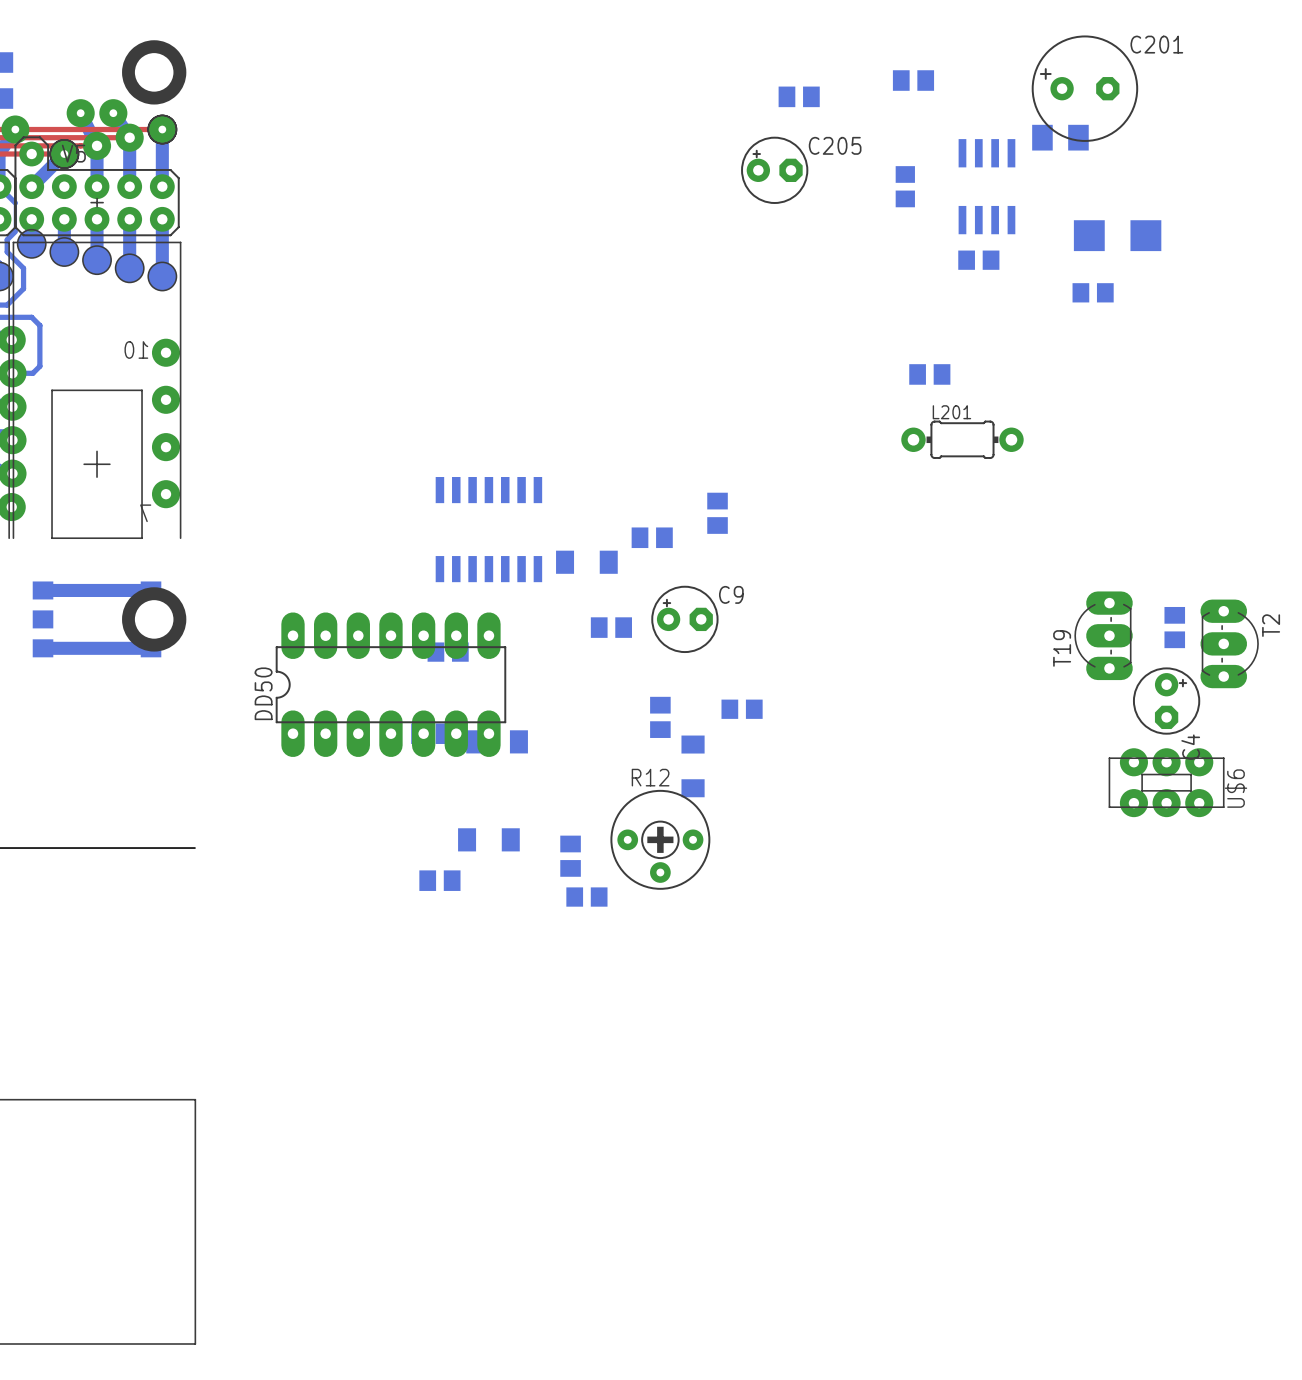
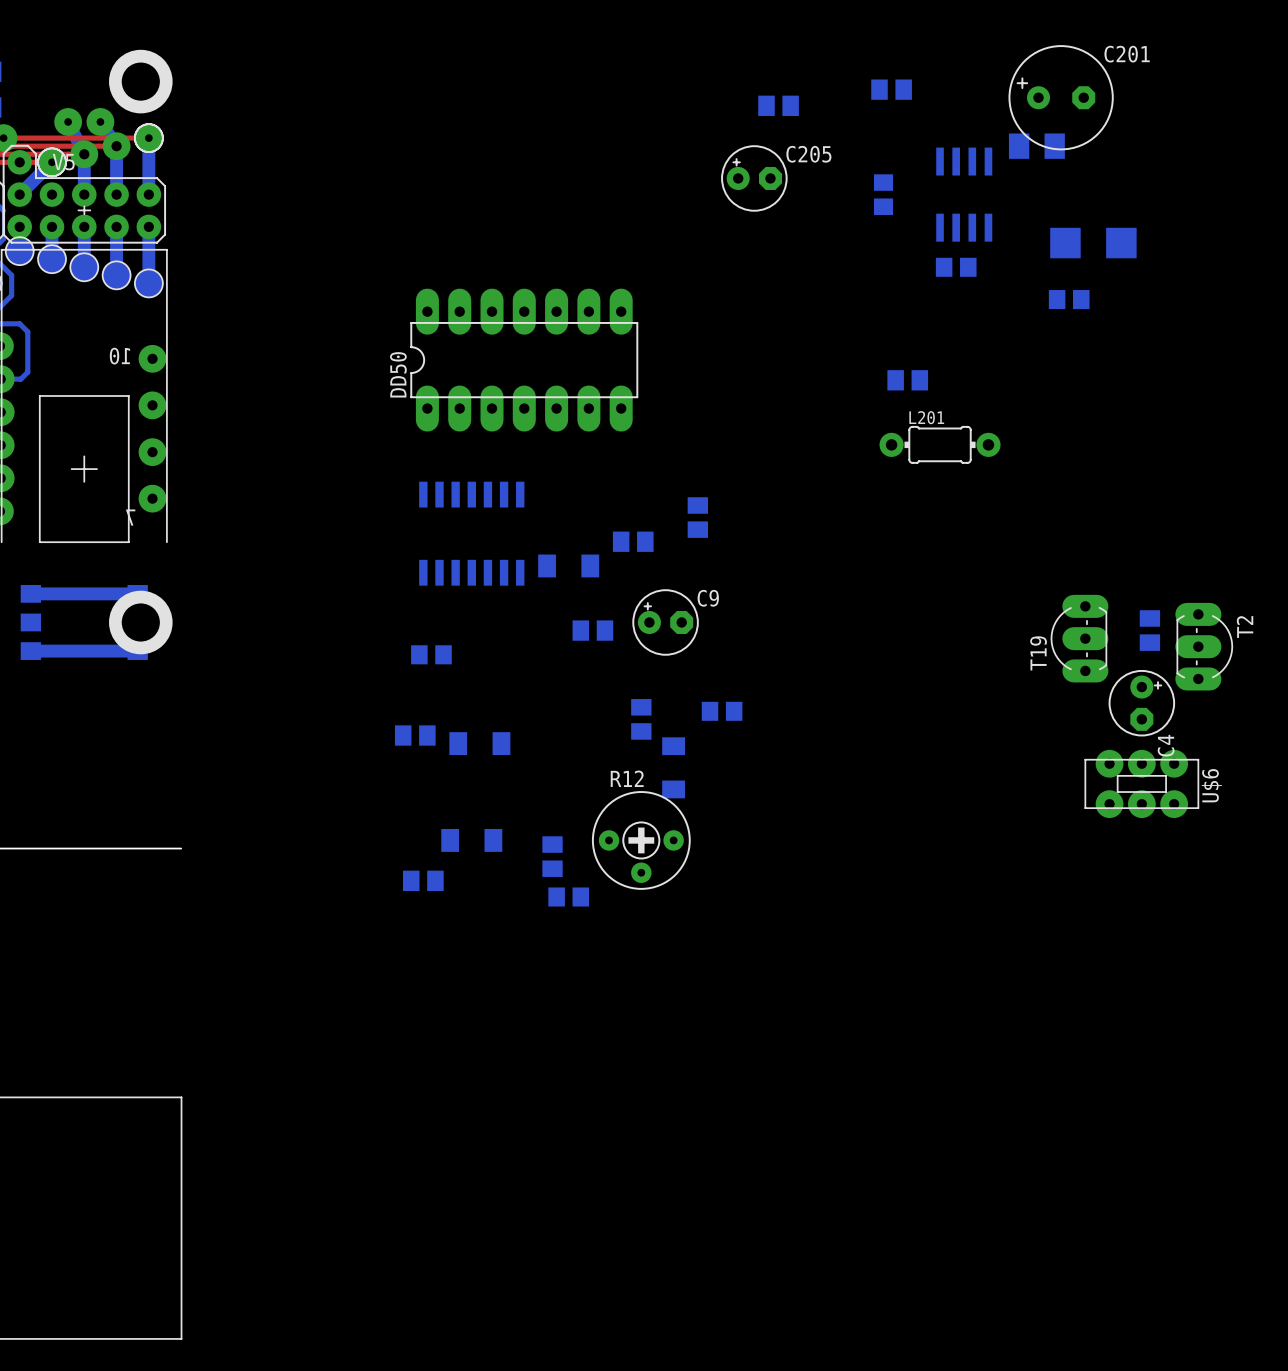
DD50 position: (390, 684) -> (524, 360)

